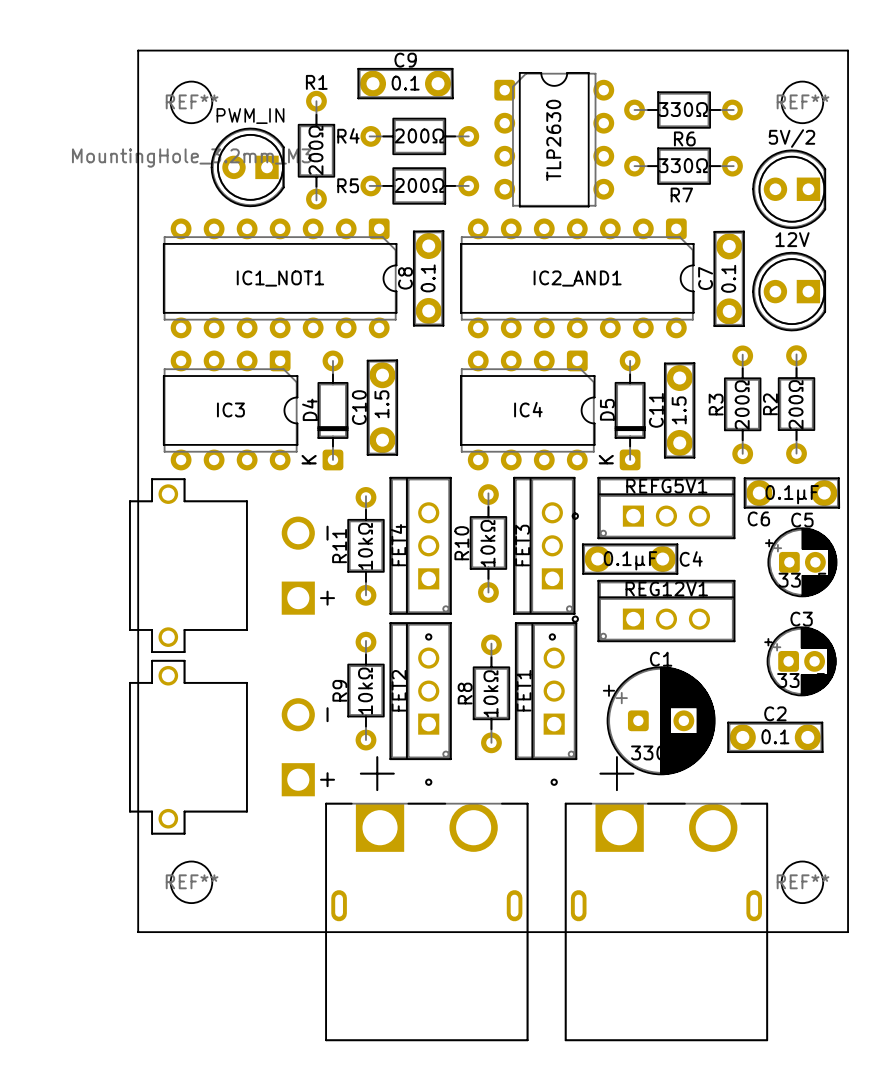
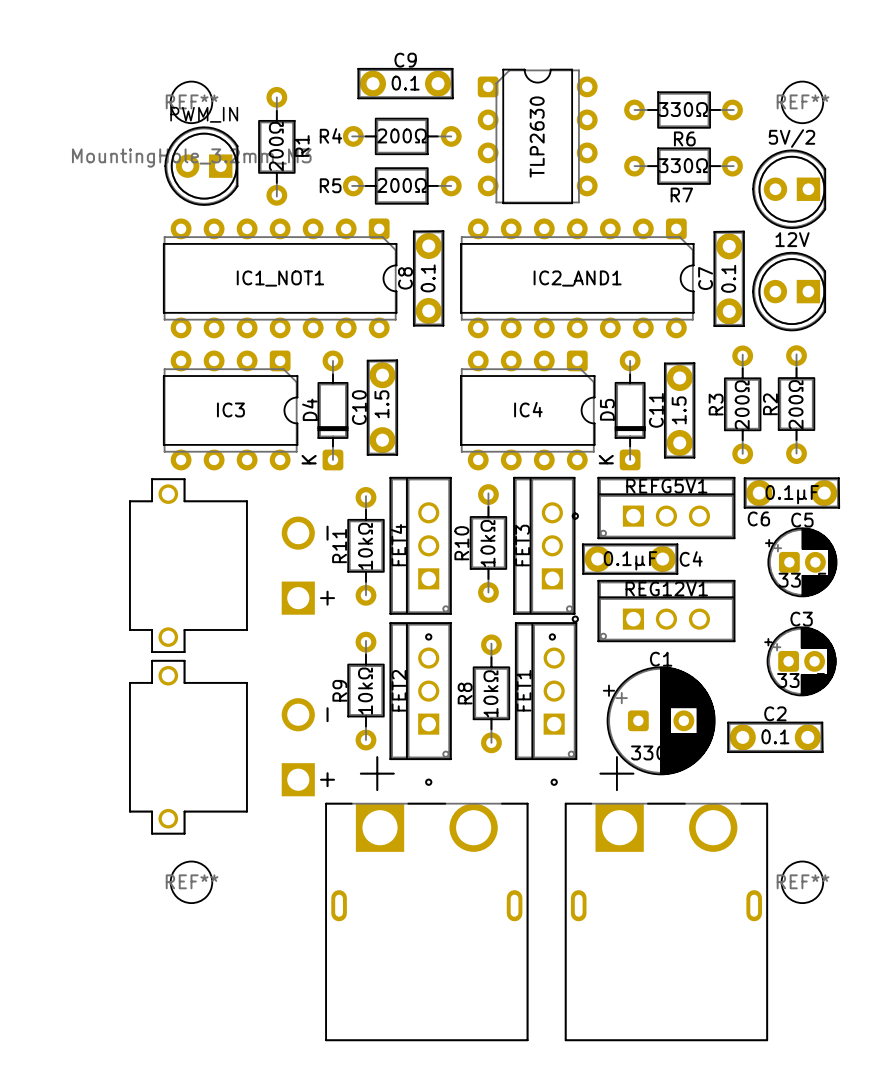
board edge: (138, 50) (848, 50) (848, 932) (138, 932) (138, 50) -> none
R1 name rotation: 0° (316, 82) -> 90° counterclockwise (302, 146)
R1 name position: R1 (316, 82) -> R1 (302, 146)
R4 position: (419, 136) -> (402, 136)
TLP2630 position: (554, 139) -> (537, 136)
R1 position: (316, 150) -> (276, 146)
part position: (247, 167) -> (201, 166)
R5 position: (419, 185) -> (402, 185)

